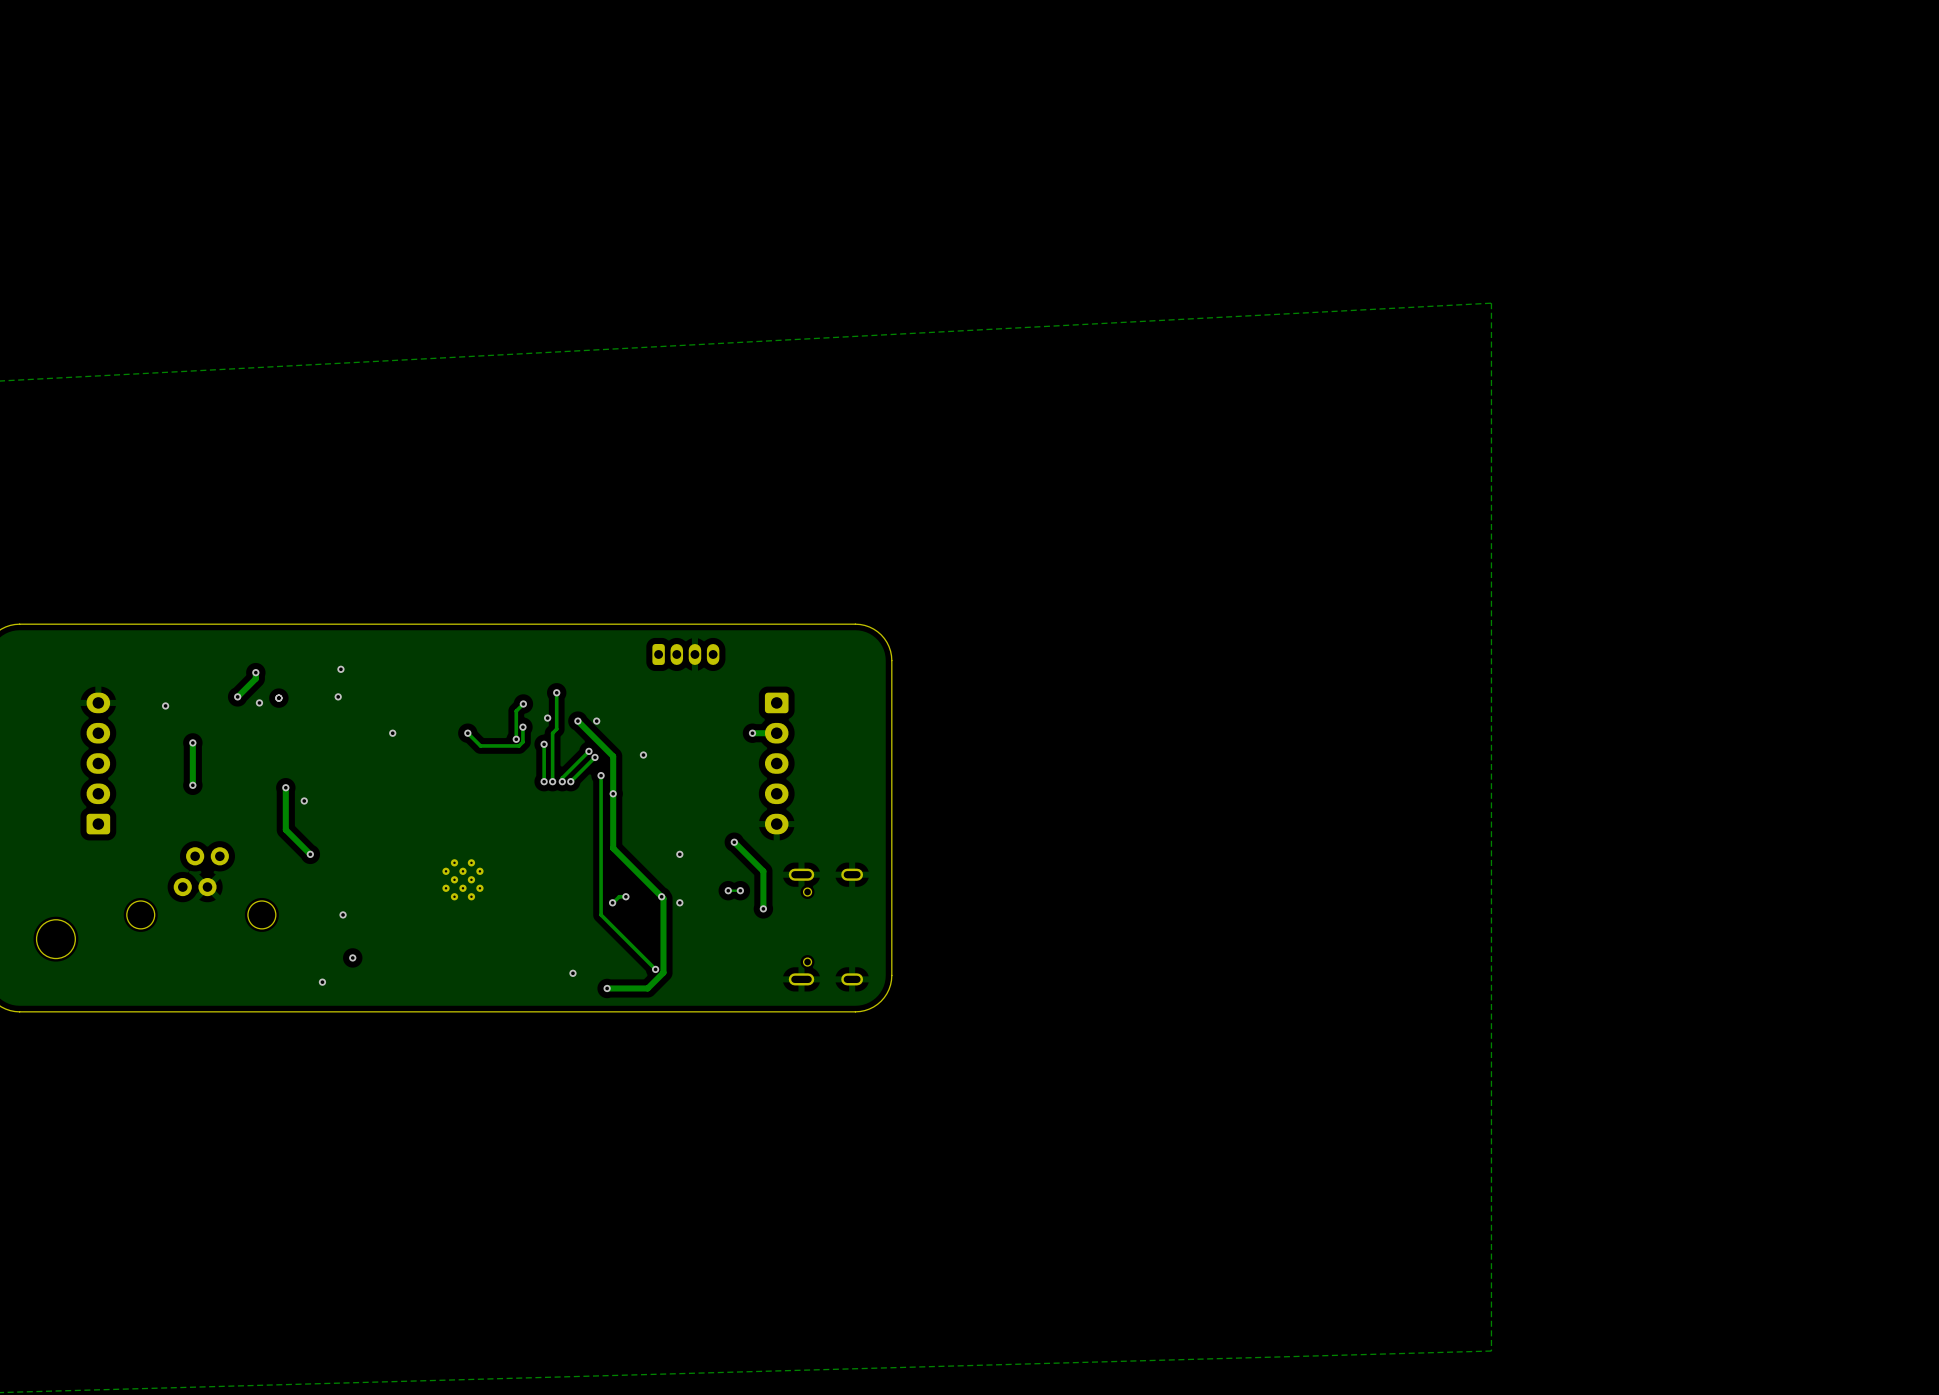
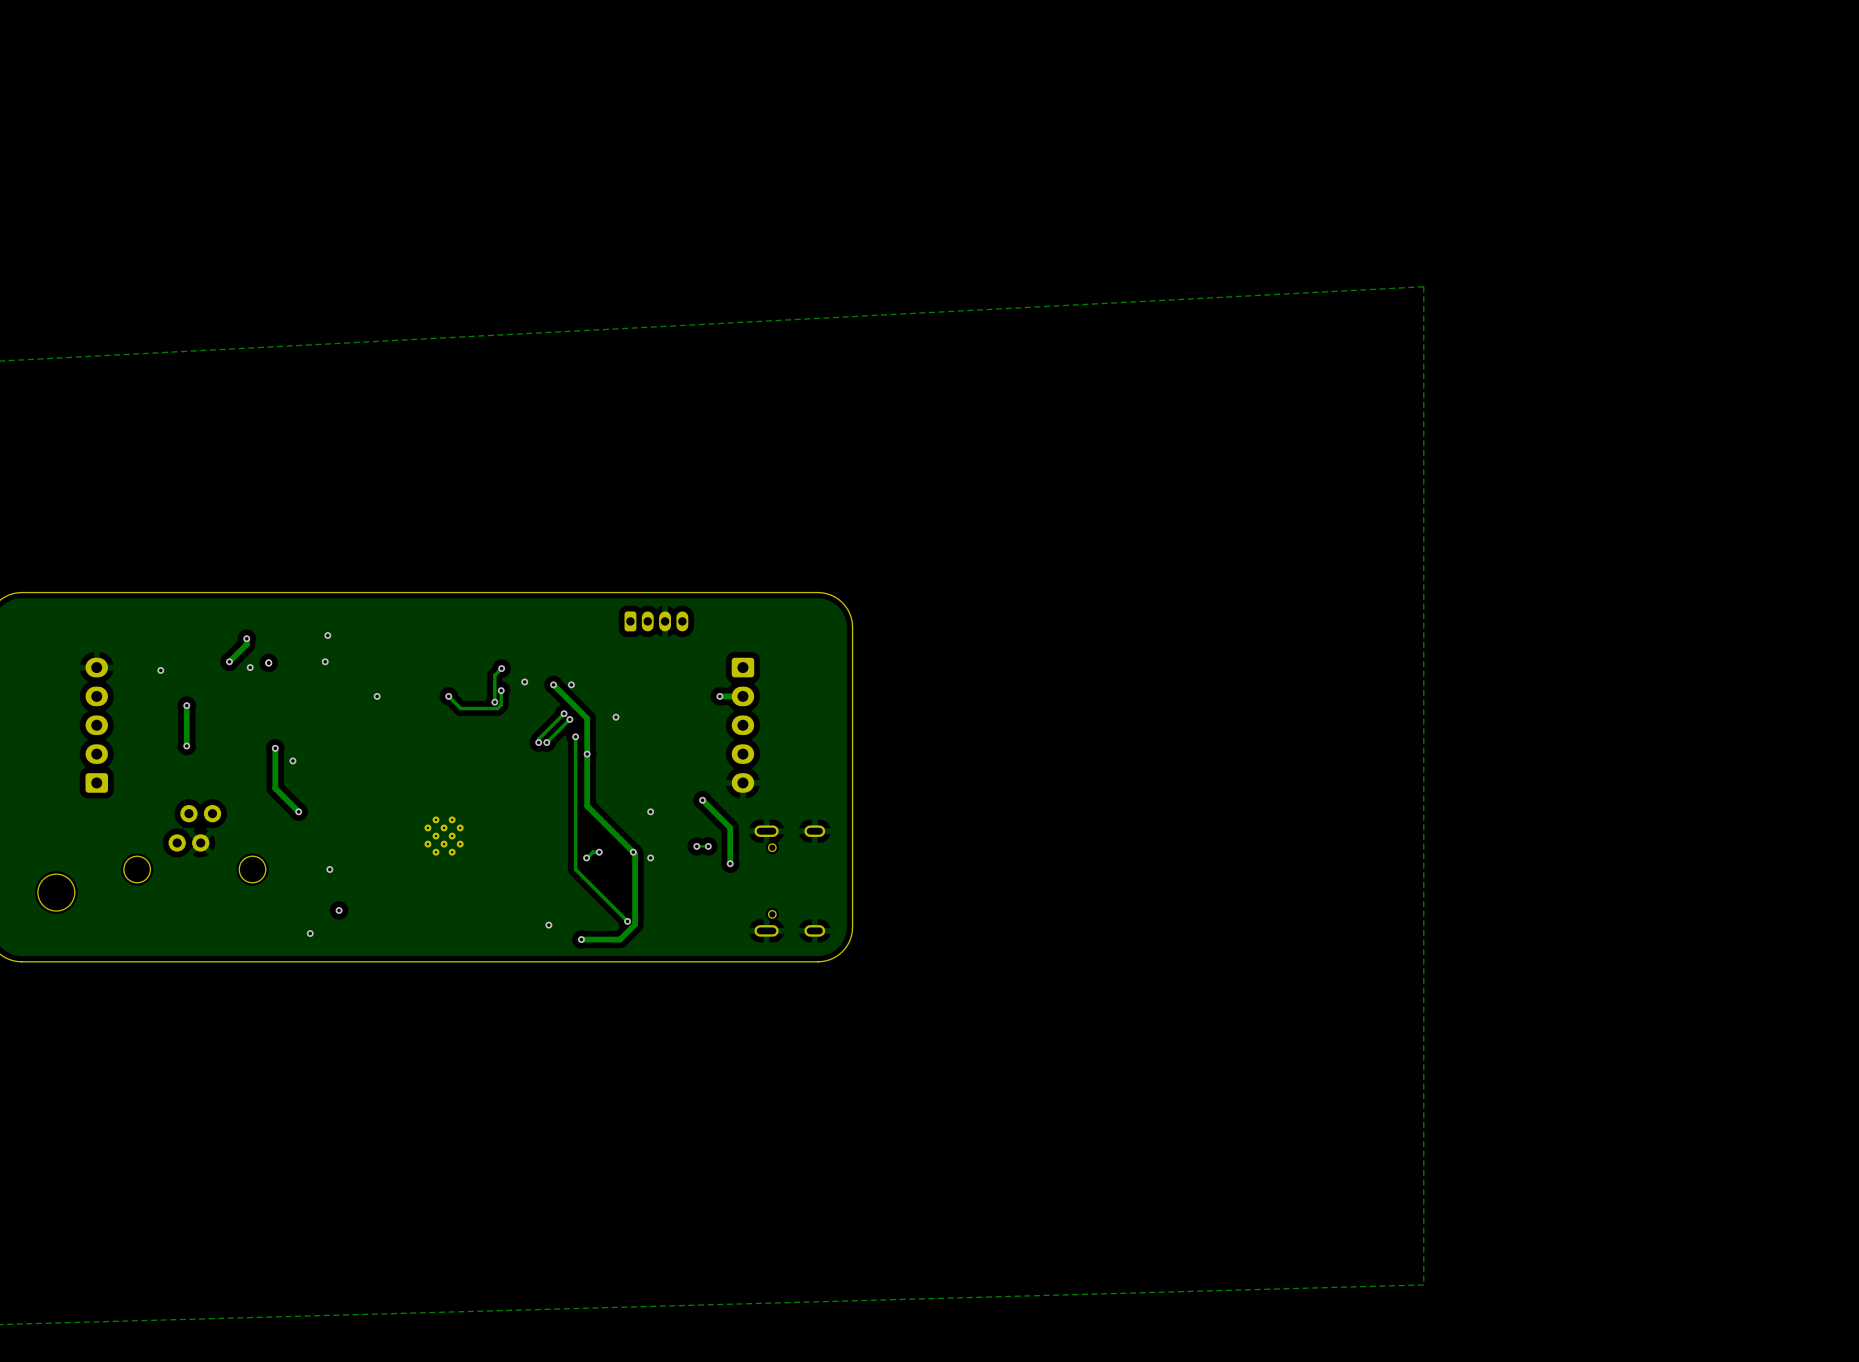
track: (556, 692) (556, 729) (552, 733) (552, 781) -> none
via: (556, 692) -> none
via: (544, 744) -> none
via: (544, 781) -> none
via: (552, 781) -> none

